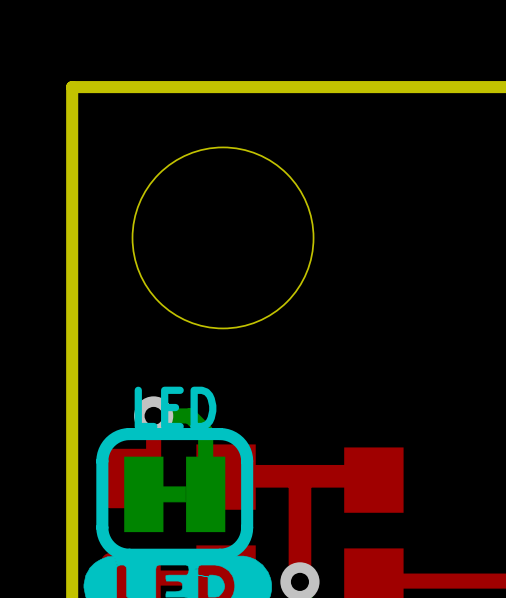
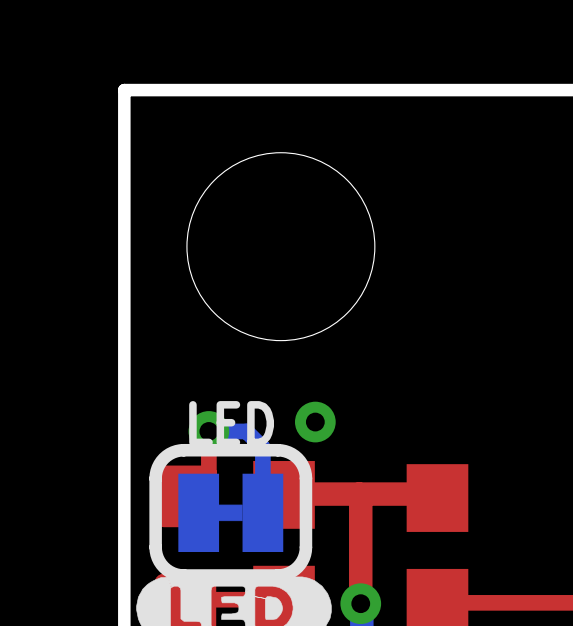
via: none -> (315, 422)

